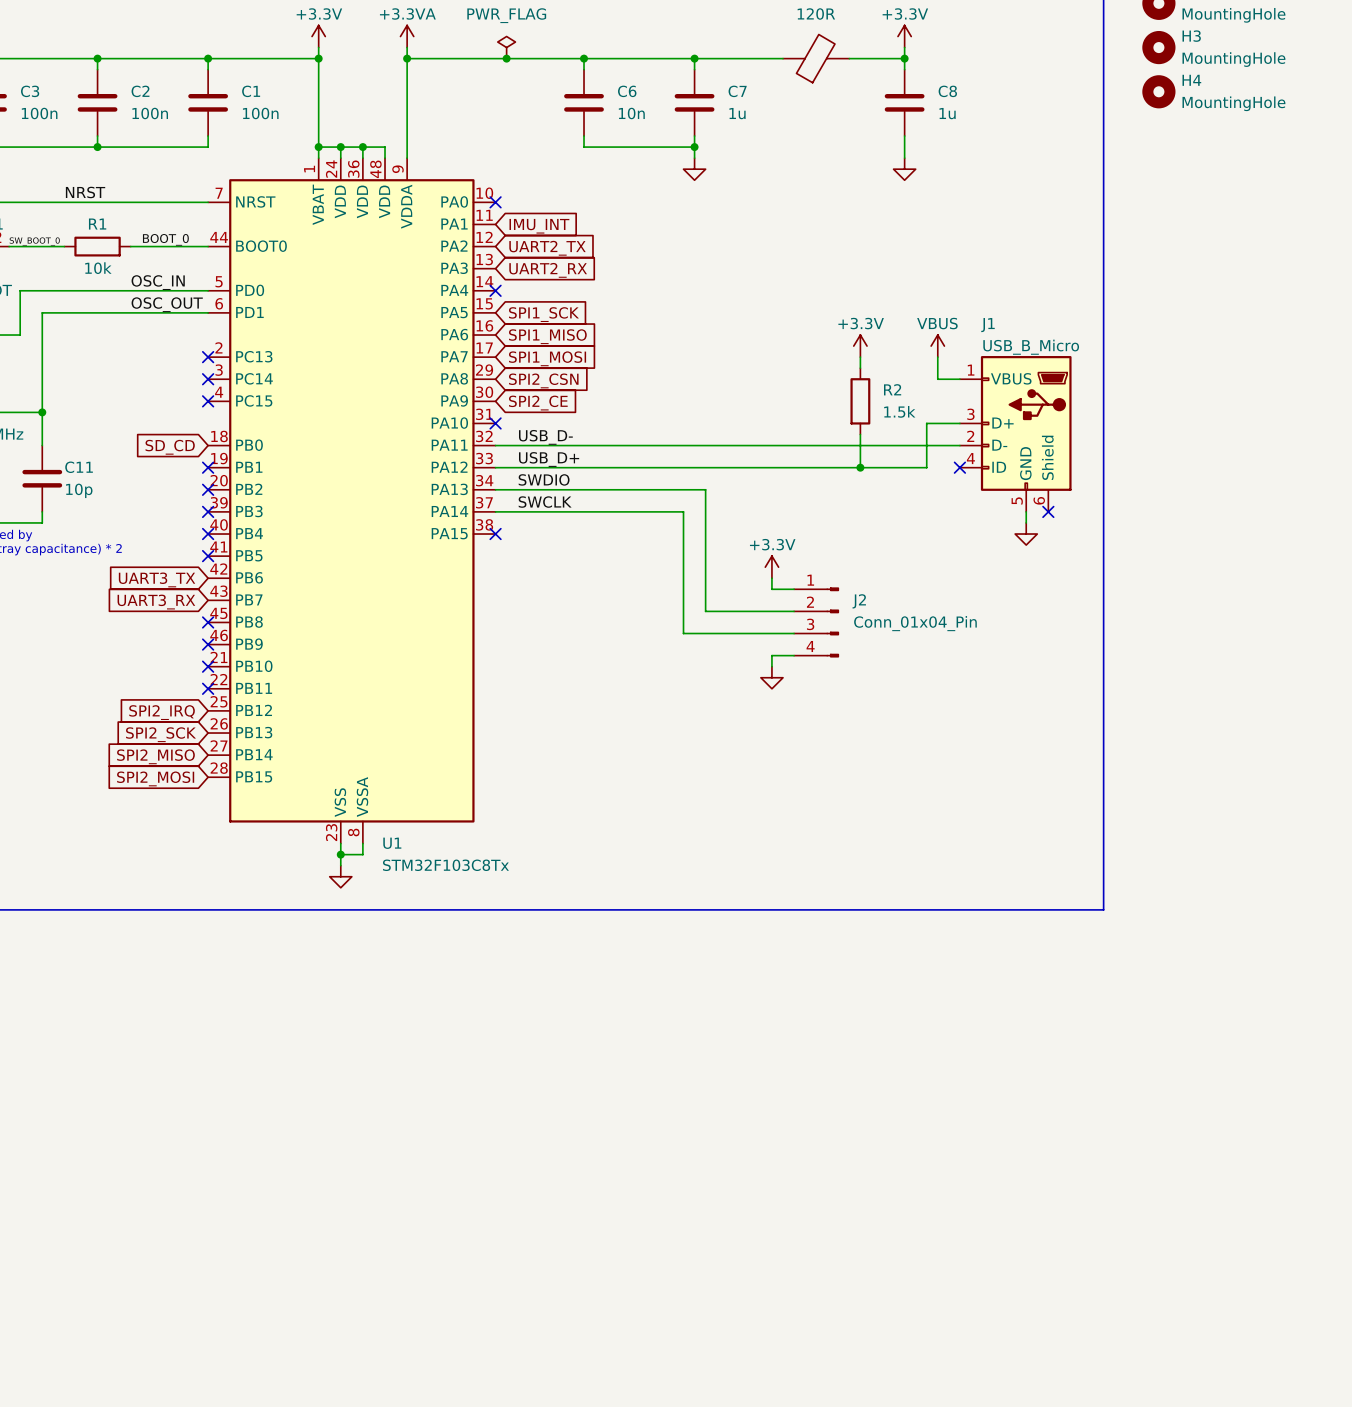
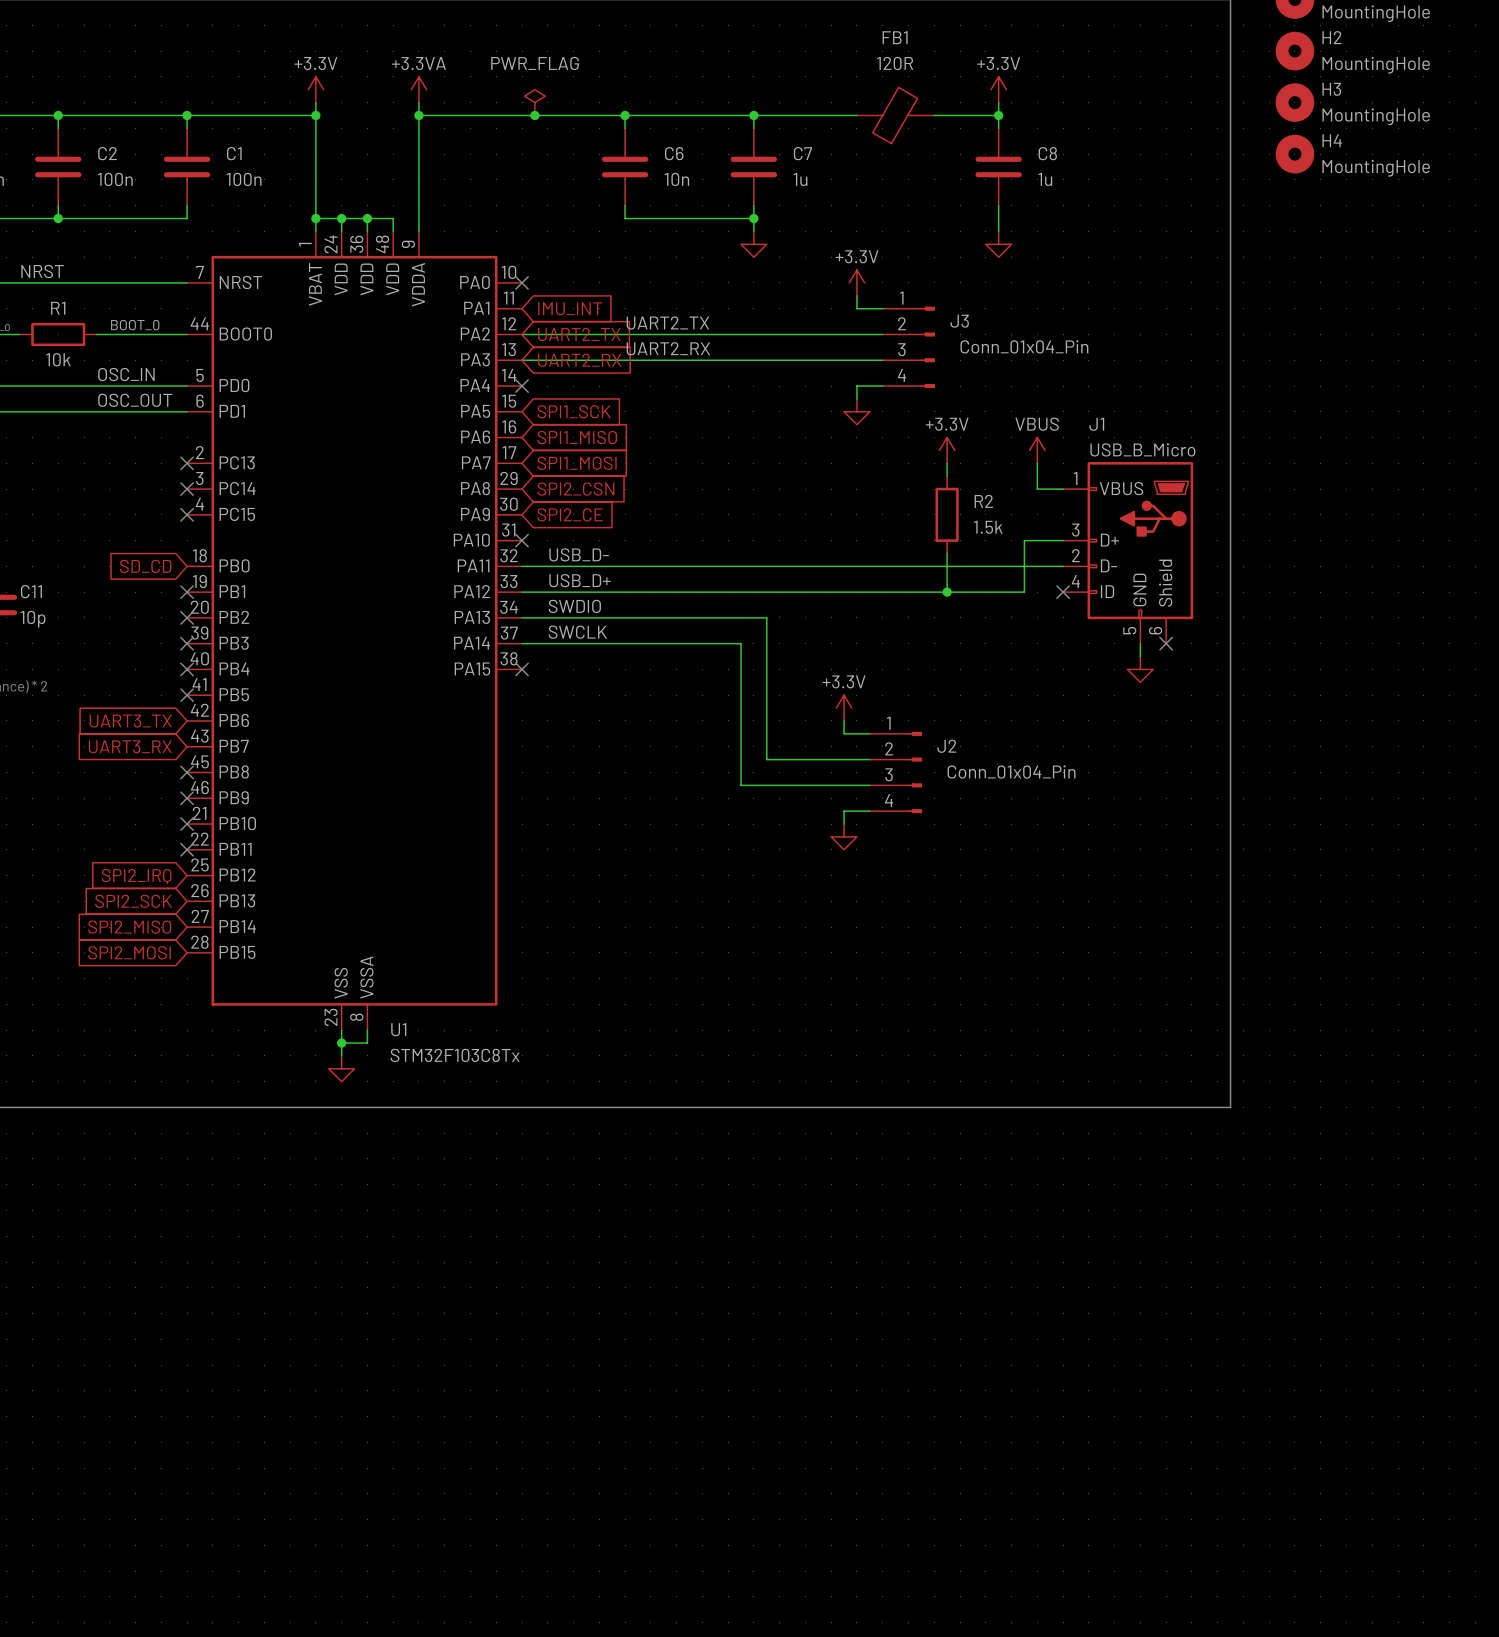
power symbol: none -> +3.3V (856, 282)
wire: none -> (856, 295) (856, 308) (882, 308)
label: none -> UART2_TX (667, 322)
wire: none -> (522, 334) (882, 334)
J3: none -> Conn_01x04_Pin (908, 347)
label: none -> UART2_RX (668, 348)
wire: none -> (522, 360) (882, 360)
wire: none -> (882, 386) (856, 386) (856, 398)
power symbol: none -> (856, 411)

